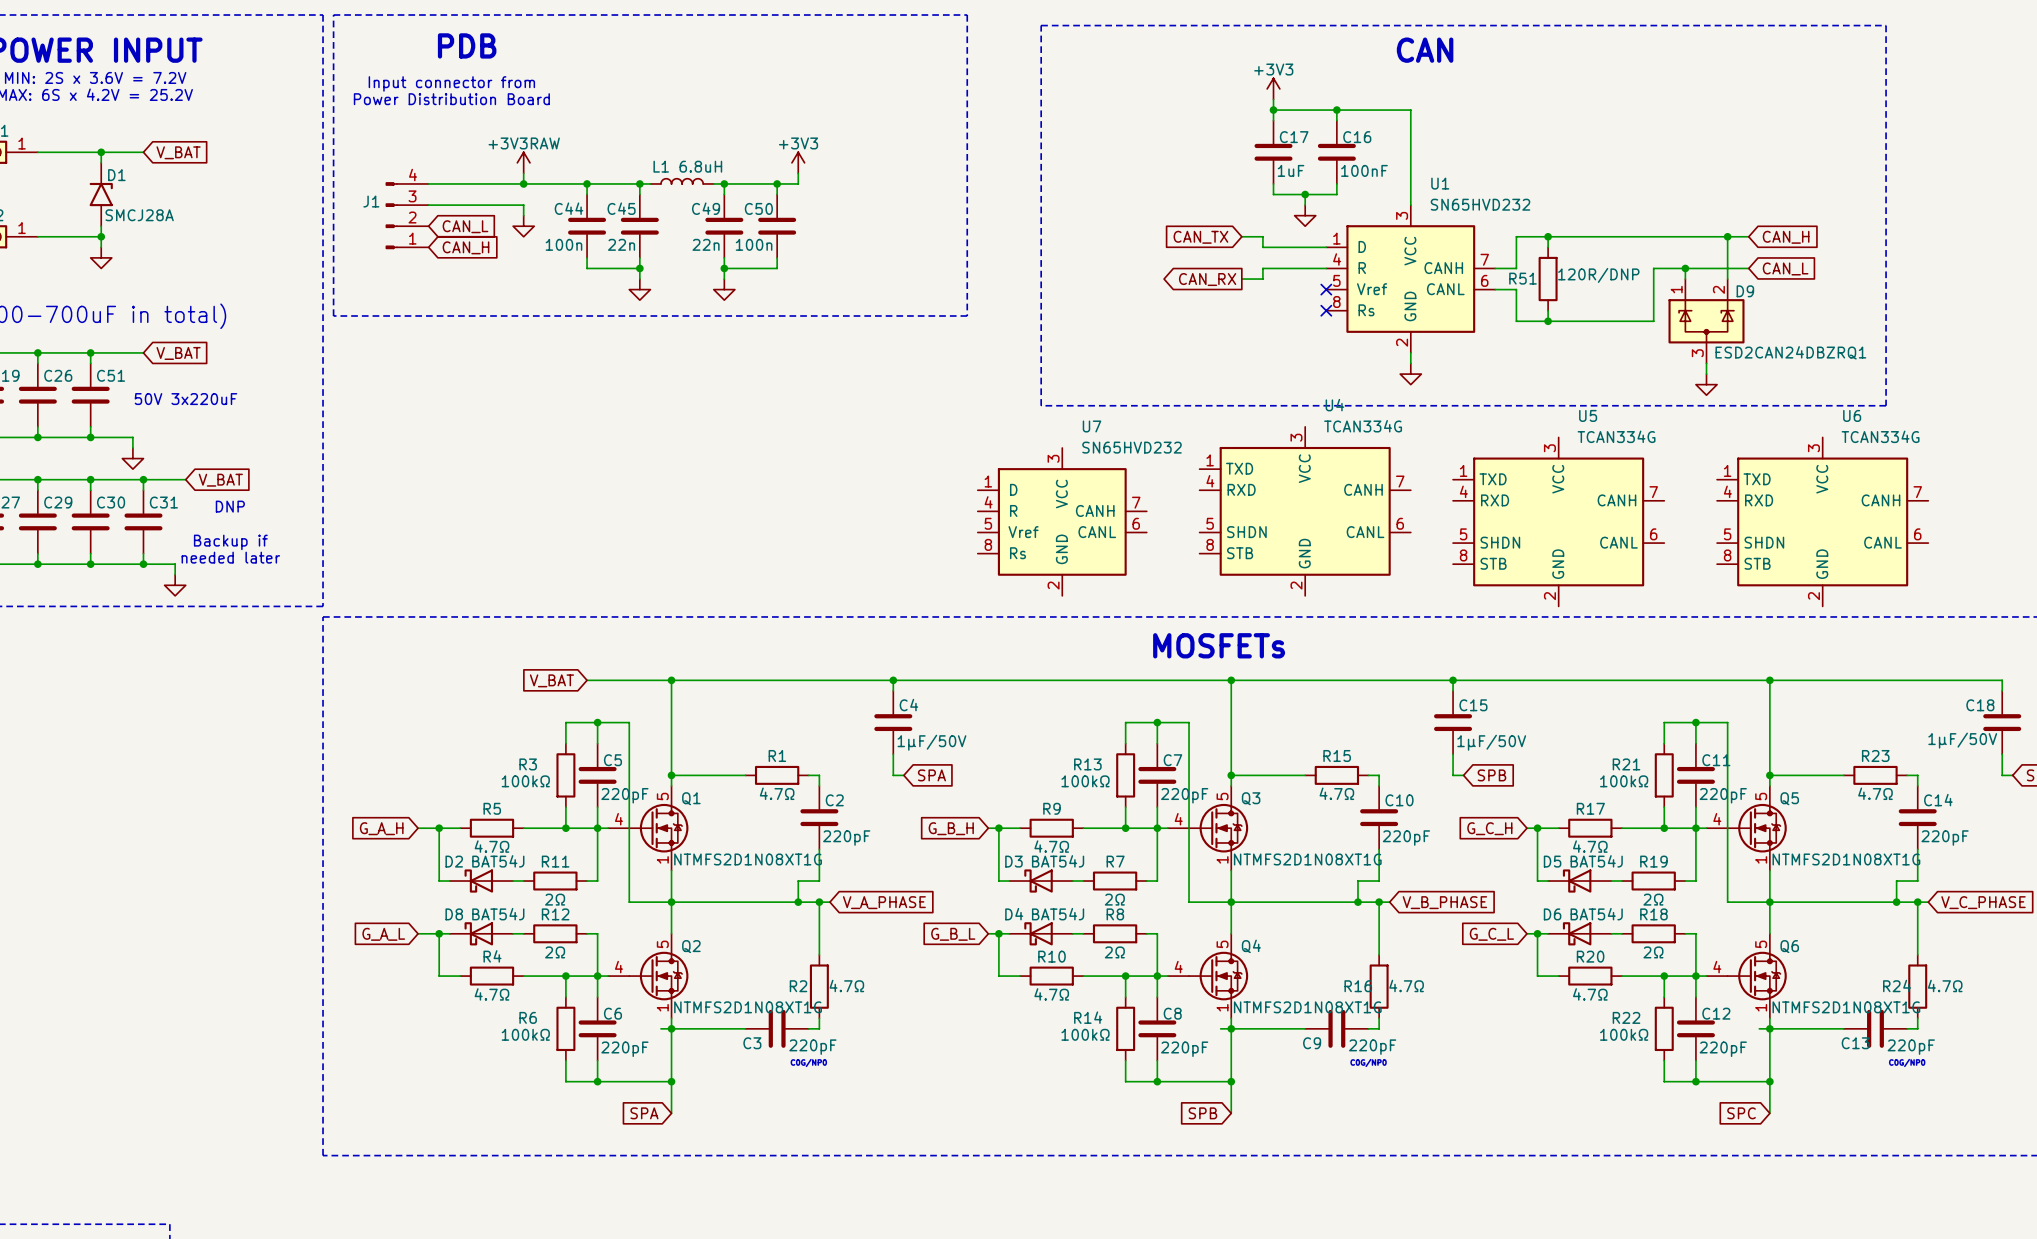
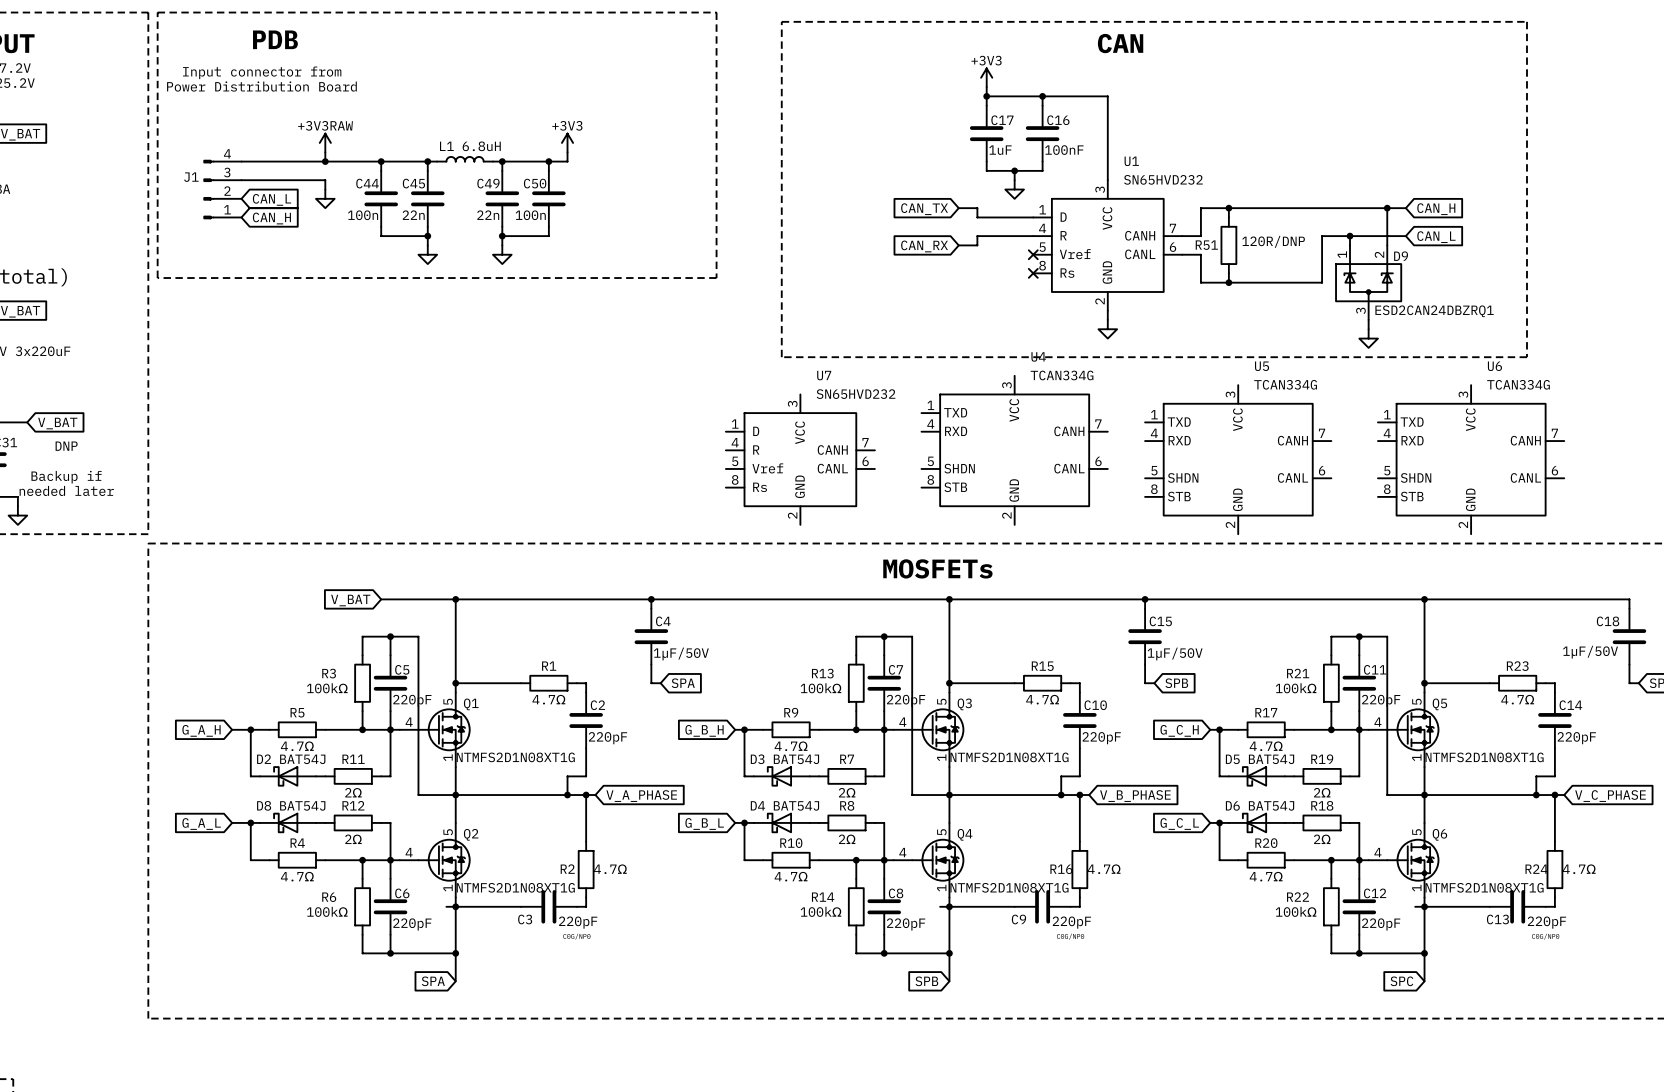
global label shape: output (1207, 279) -> input (924, 246)

